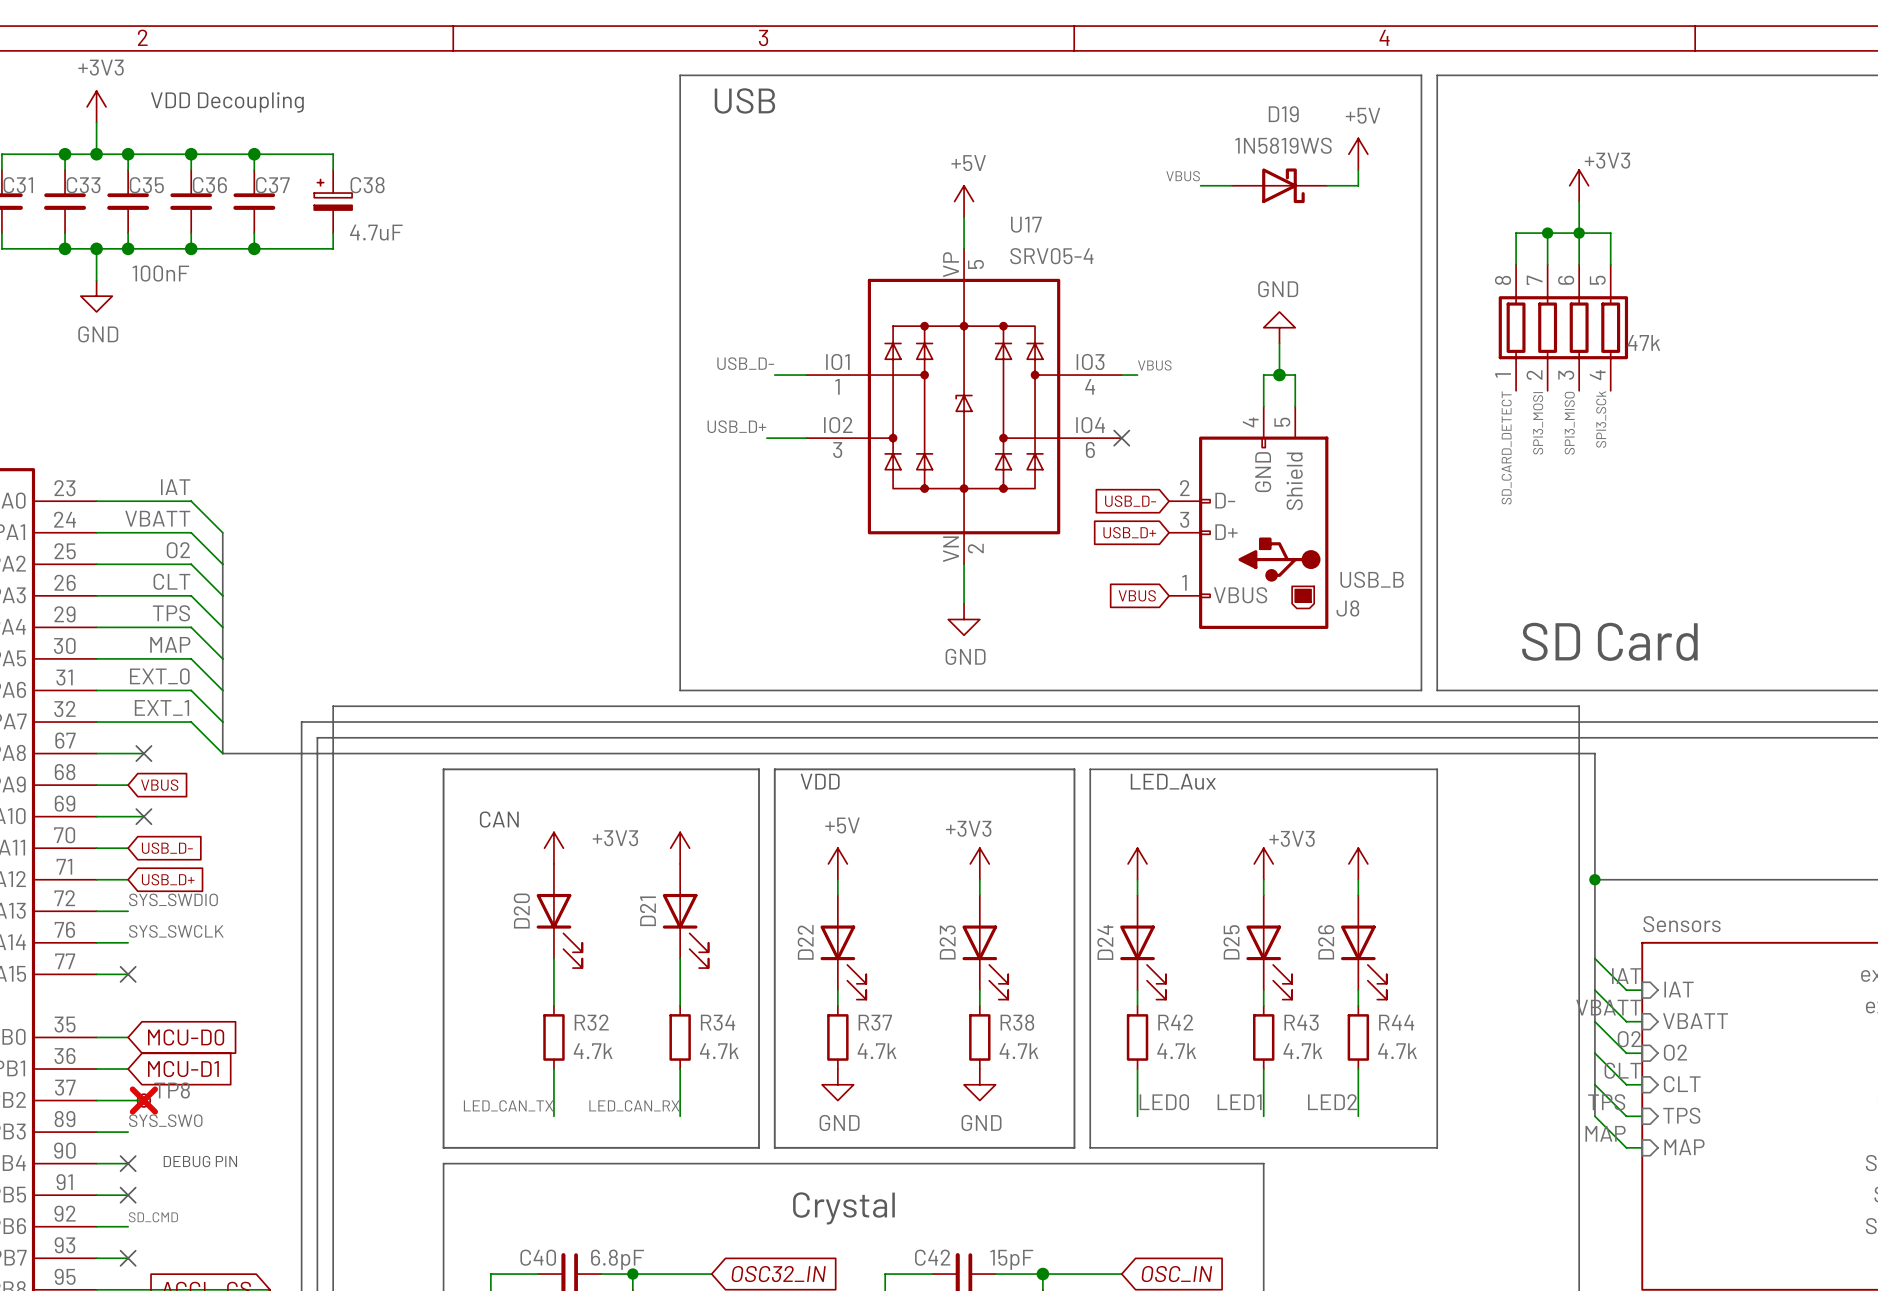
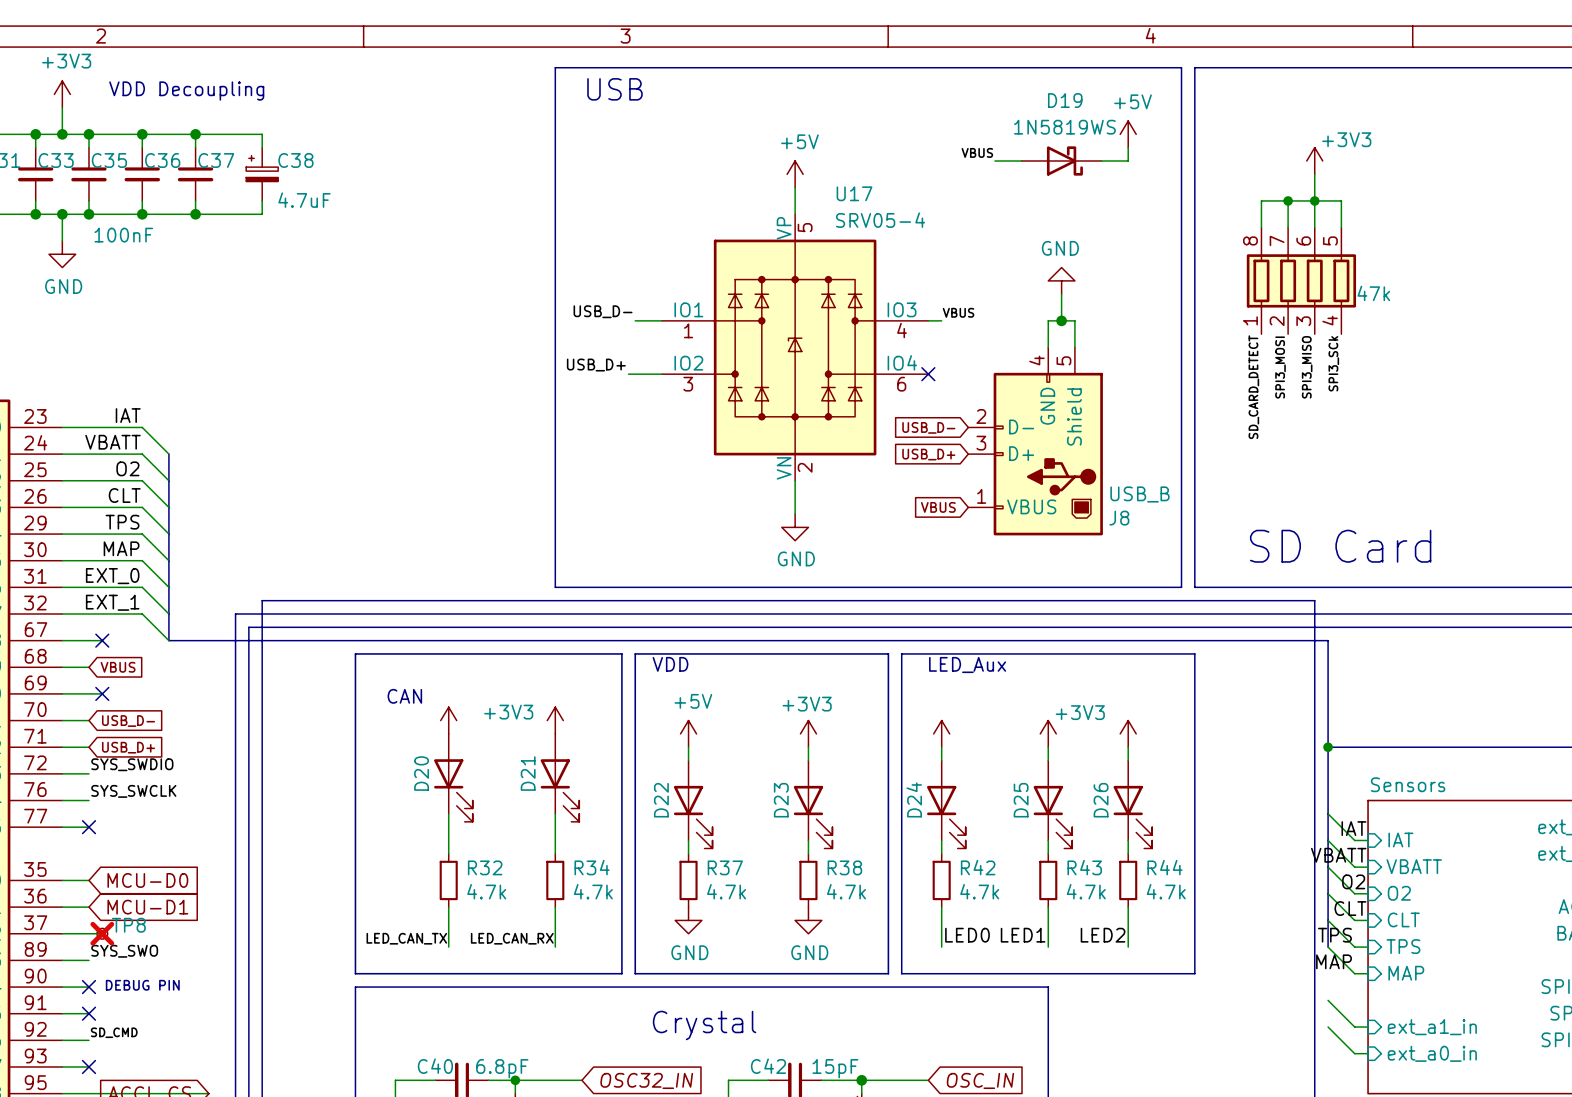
wire: none -> (1328, 1000) (1354, 1027) (1368, 1027)
wire: none -> (1328, 1027) (1354, 1053) (1368, 1053)
sheet pin: none -> ext_a1_in (1432, 1027)
sheet pin: none -> ext_a0_in (1432, 1053)

